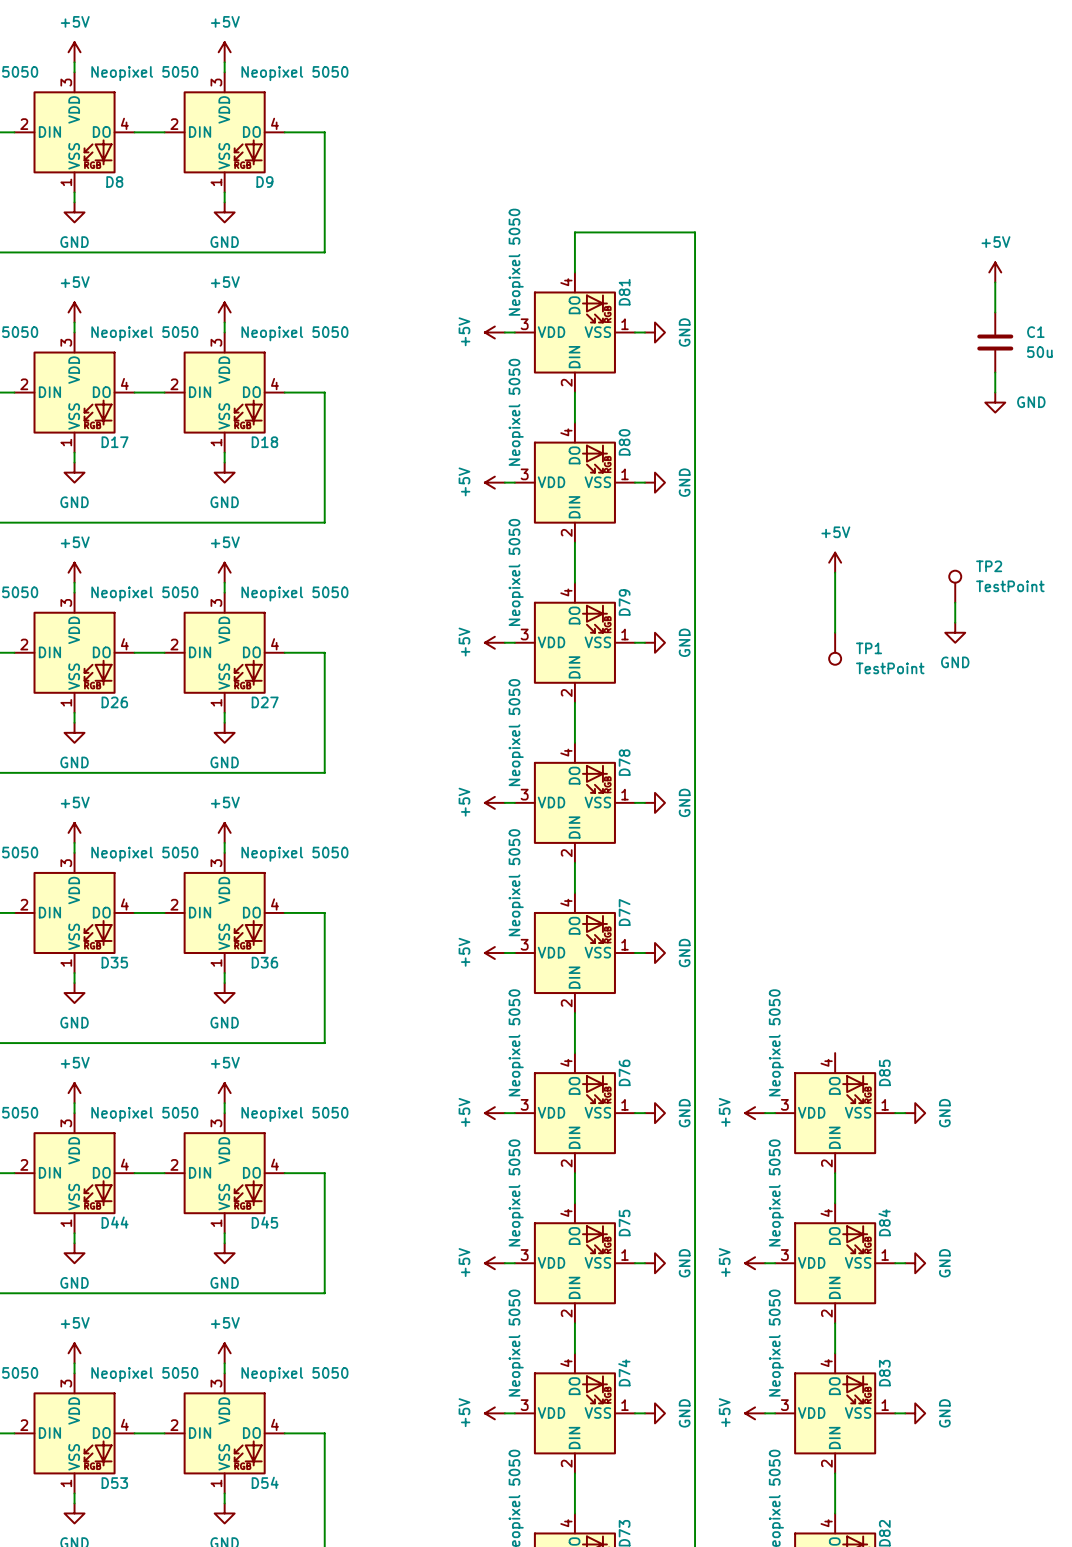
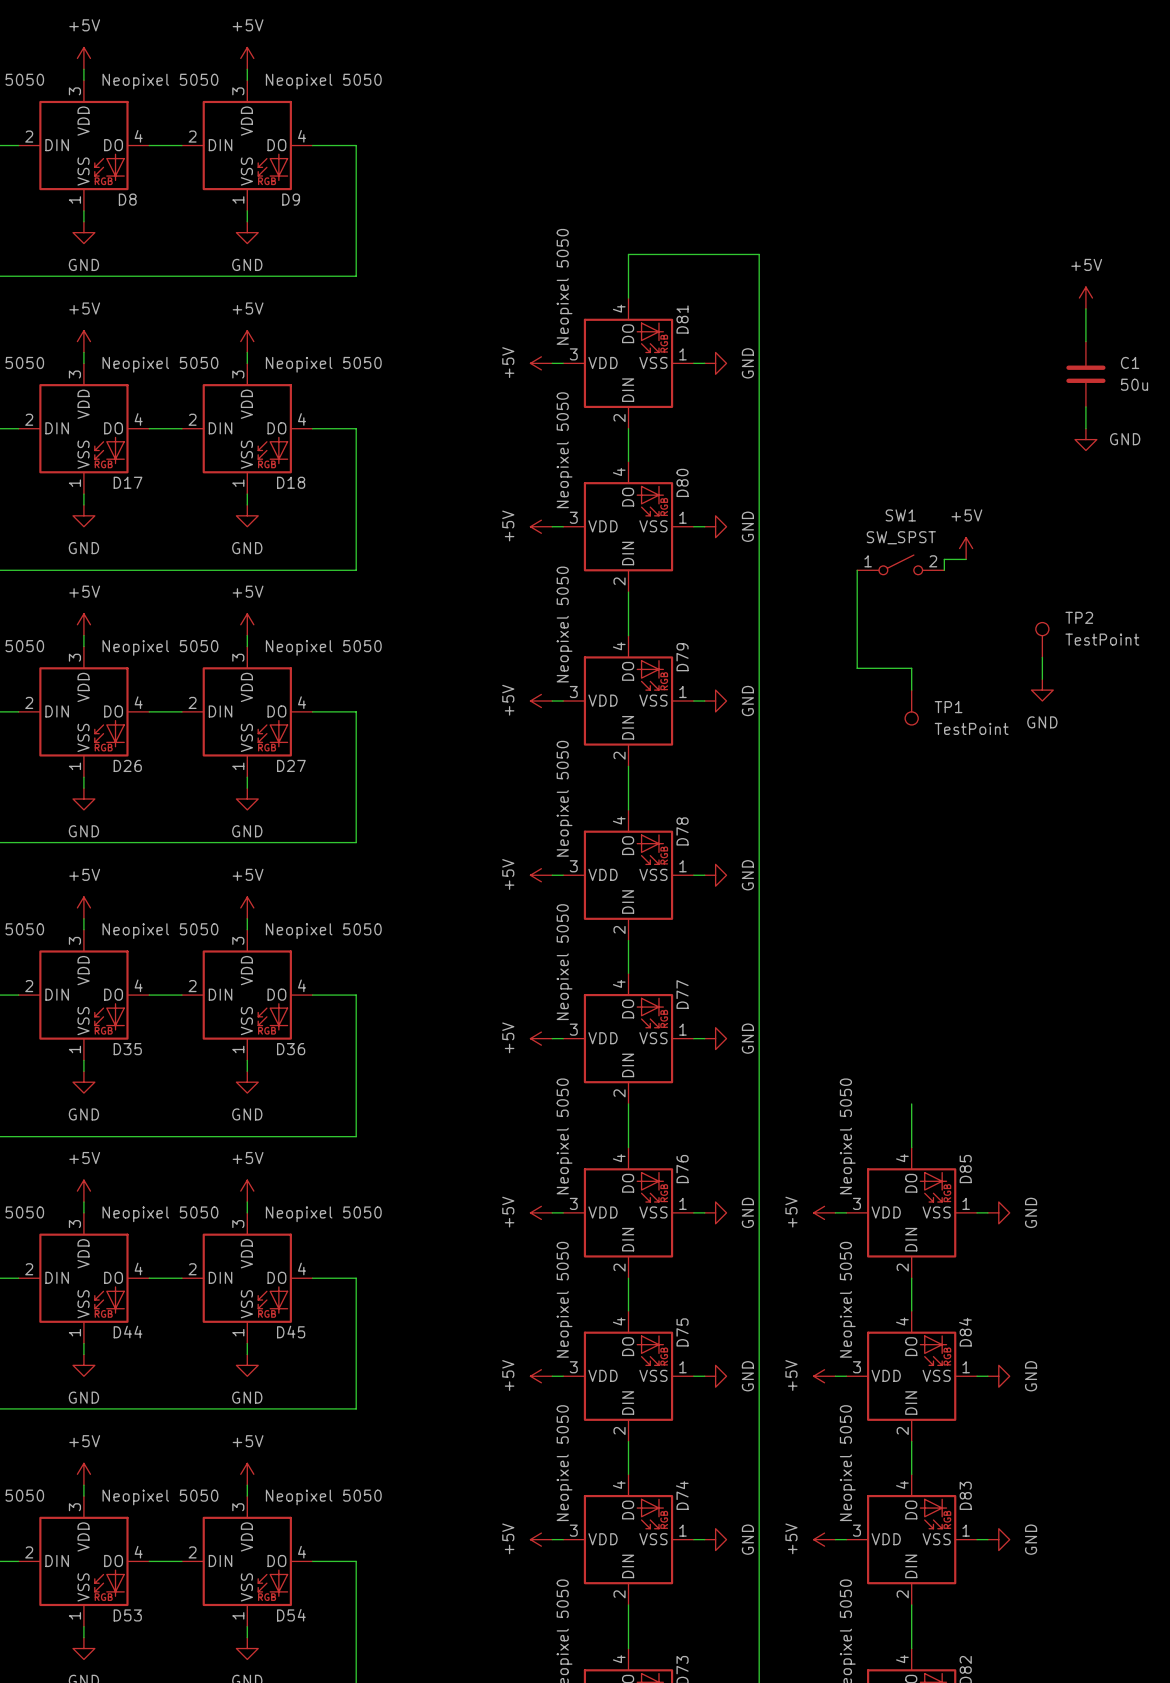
wire: none -> (966, 559) (944, 559) (944, 570)
SW1: none -> SW_SPST (900, 564)
power symbol position: +5V (835, 562) -> +5V (966, 548)
wire: (835, 572) (835, 612) -> (857, 570) (857, 668) (911, 668)
wire: none -> (911, 1103) (911, 1147)

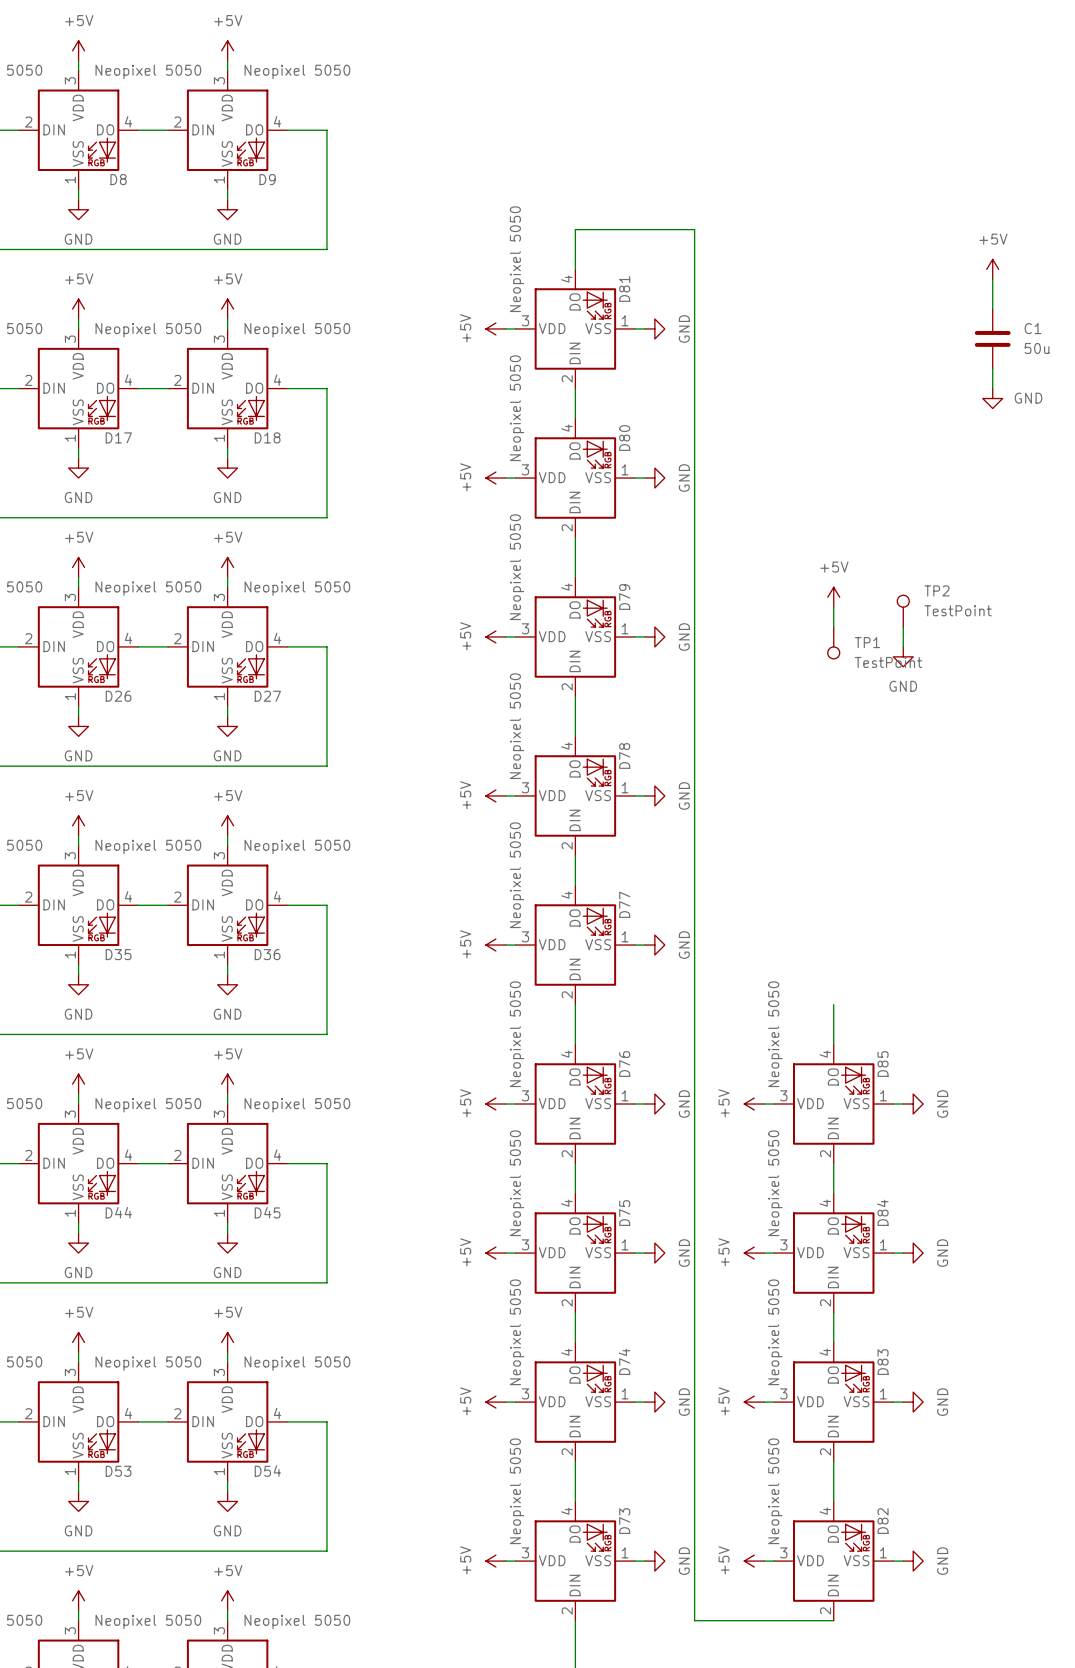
power symbol position: +5V (966, 548) -> +5V (833, 597)
wire: (966, 559) (944, 559) (944, 570) -> none
SW1: SW_SPST (900, 564) -> none
wire: (857, 570) (857, 668) (911, 668) -> none
TP2 position: (1042, 640) -> (903, 611)
wire: (1042, 657) (1042, 679) -> (903, 627) (903, 646)
power symbol position: GND (1042, 690) -> GND (903, 656)

